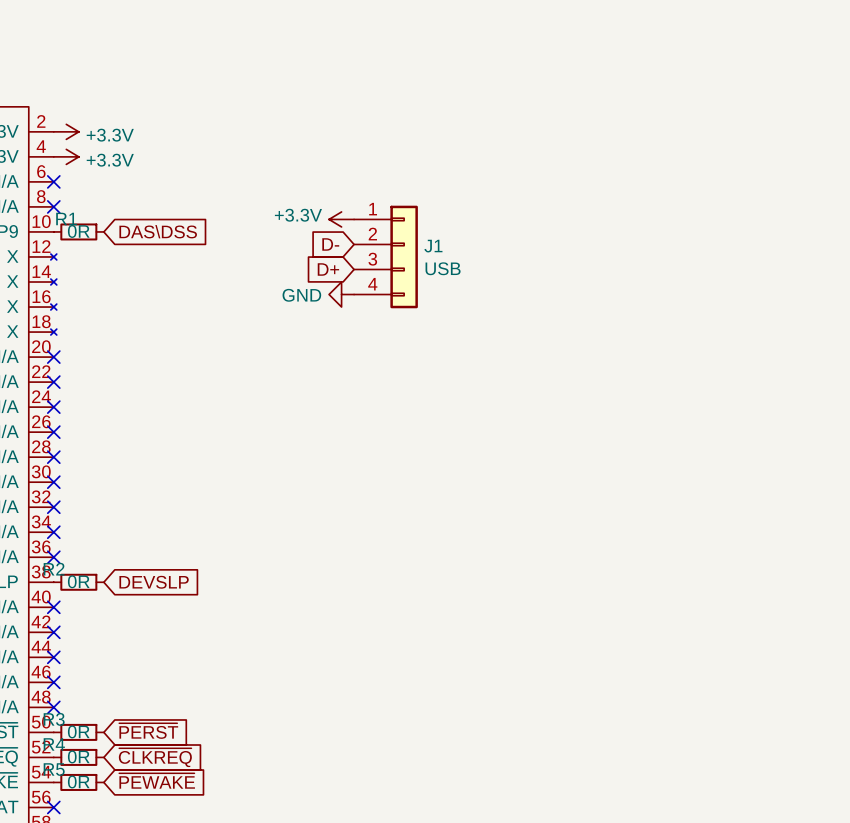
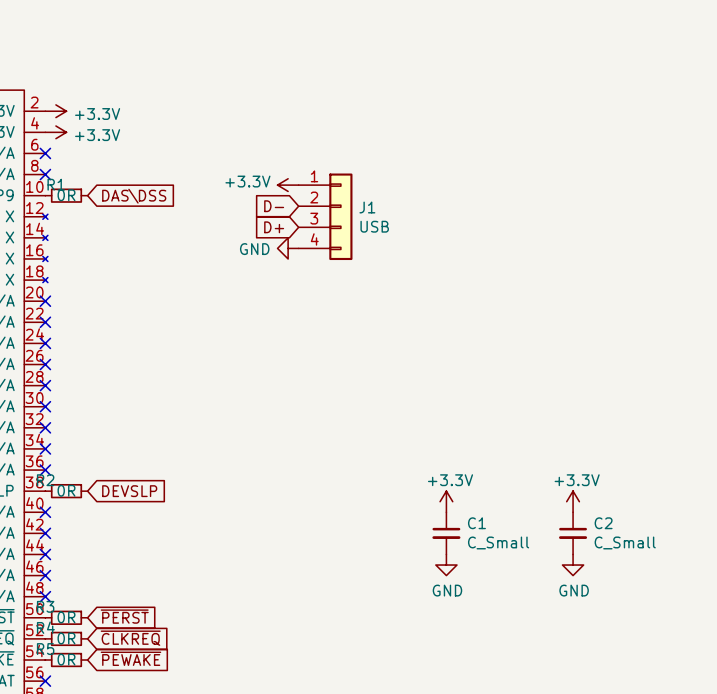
power symbol: none -> +3.3V (446, 501)
power symbol: none -> +3.3V (573, 501)
C1: none -> C_Small (446, 533)
C2: none -> C_Small (573, 533)
power symbol: none -> GND (446, 565)
power symbol: none -> GND (573, 565)

